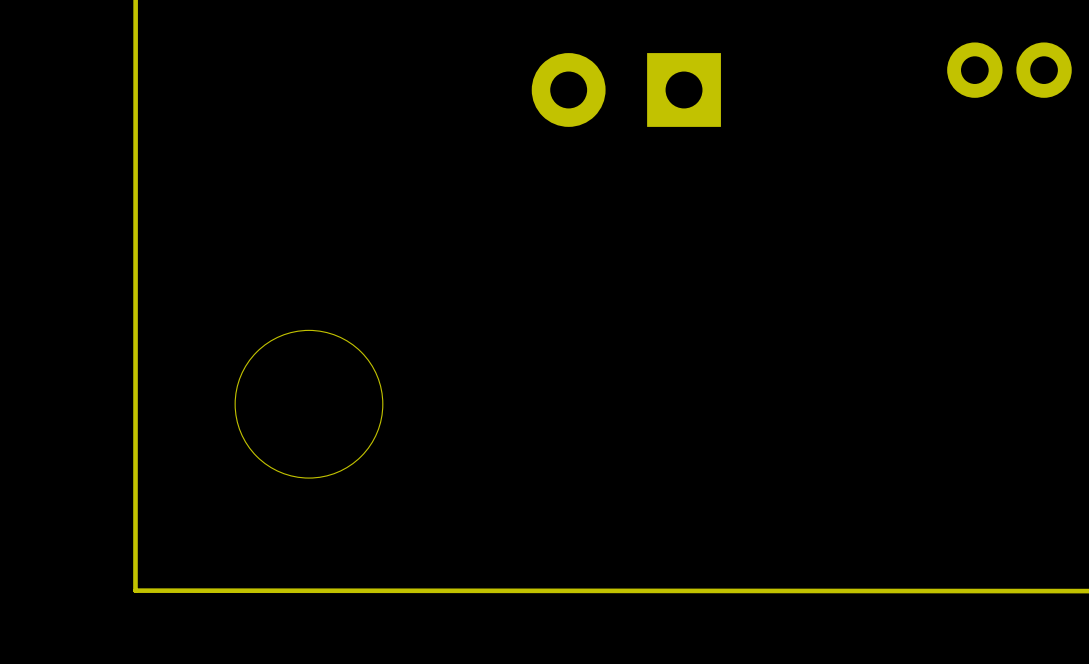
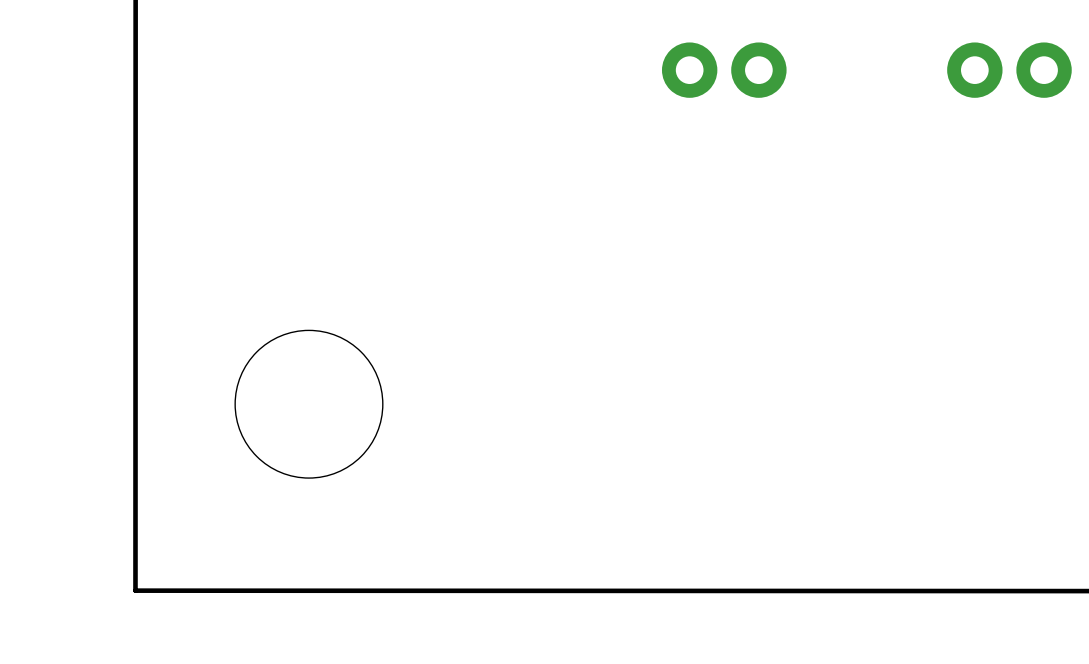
part: none -> (724, 70)
part: (626, 89) -> none

